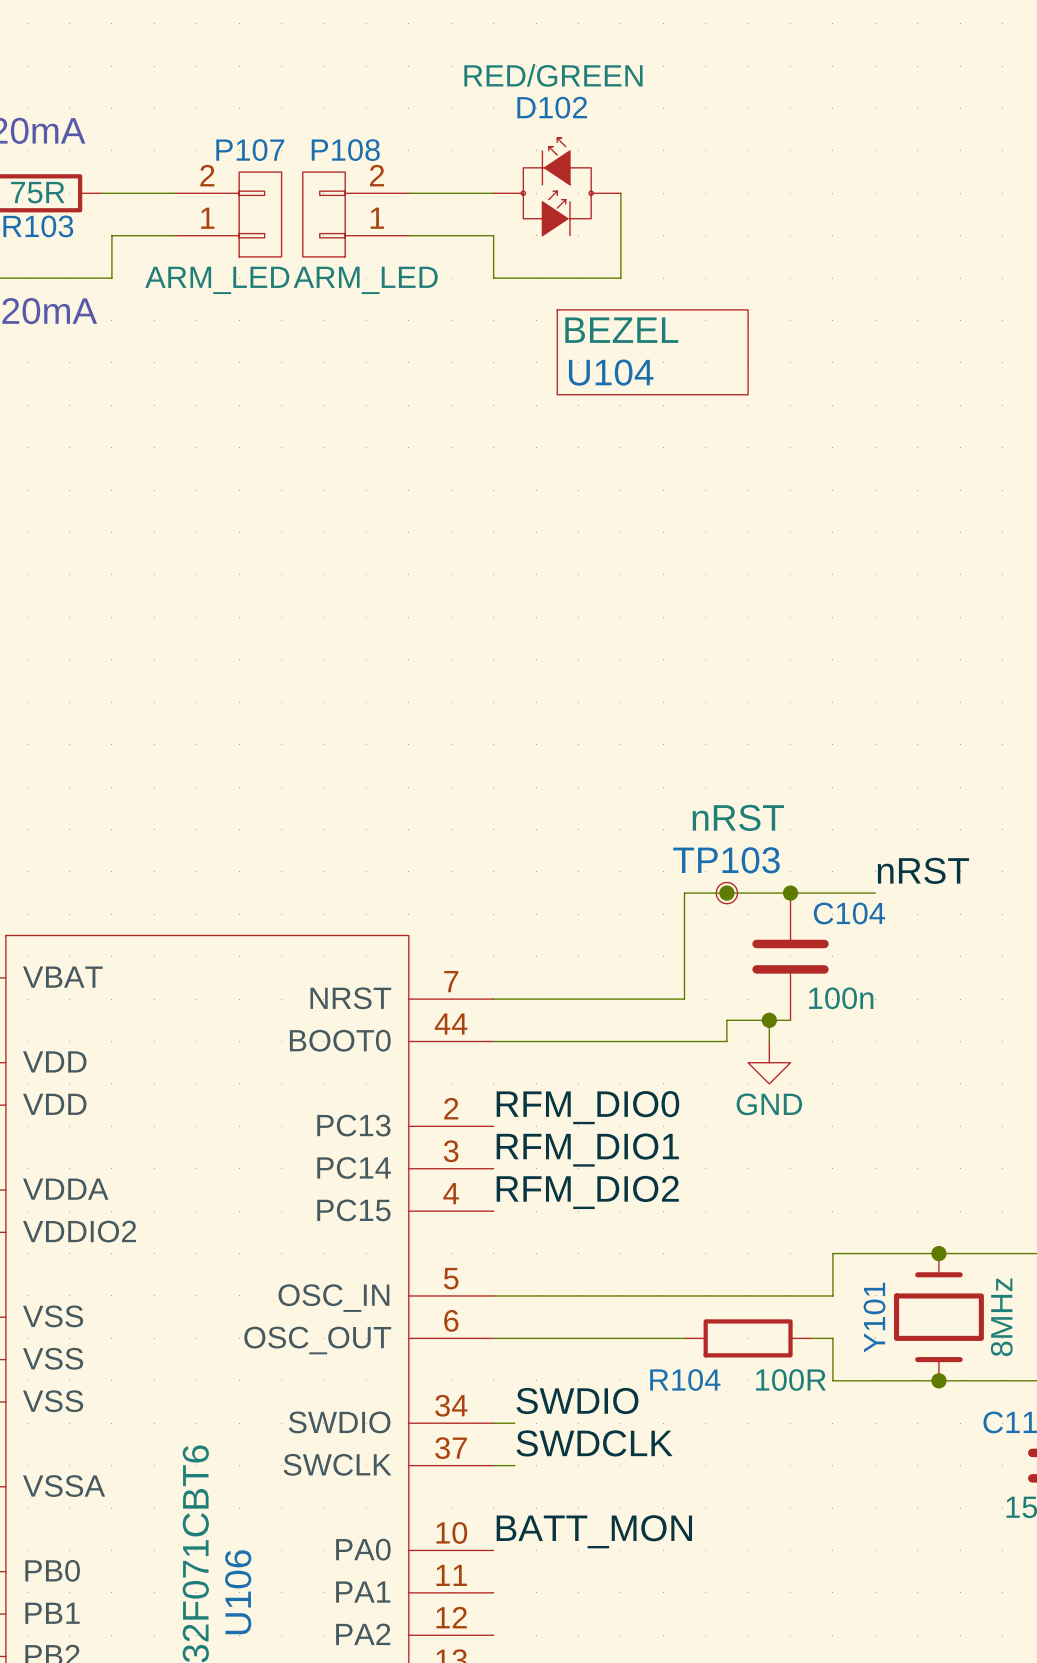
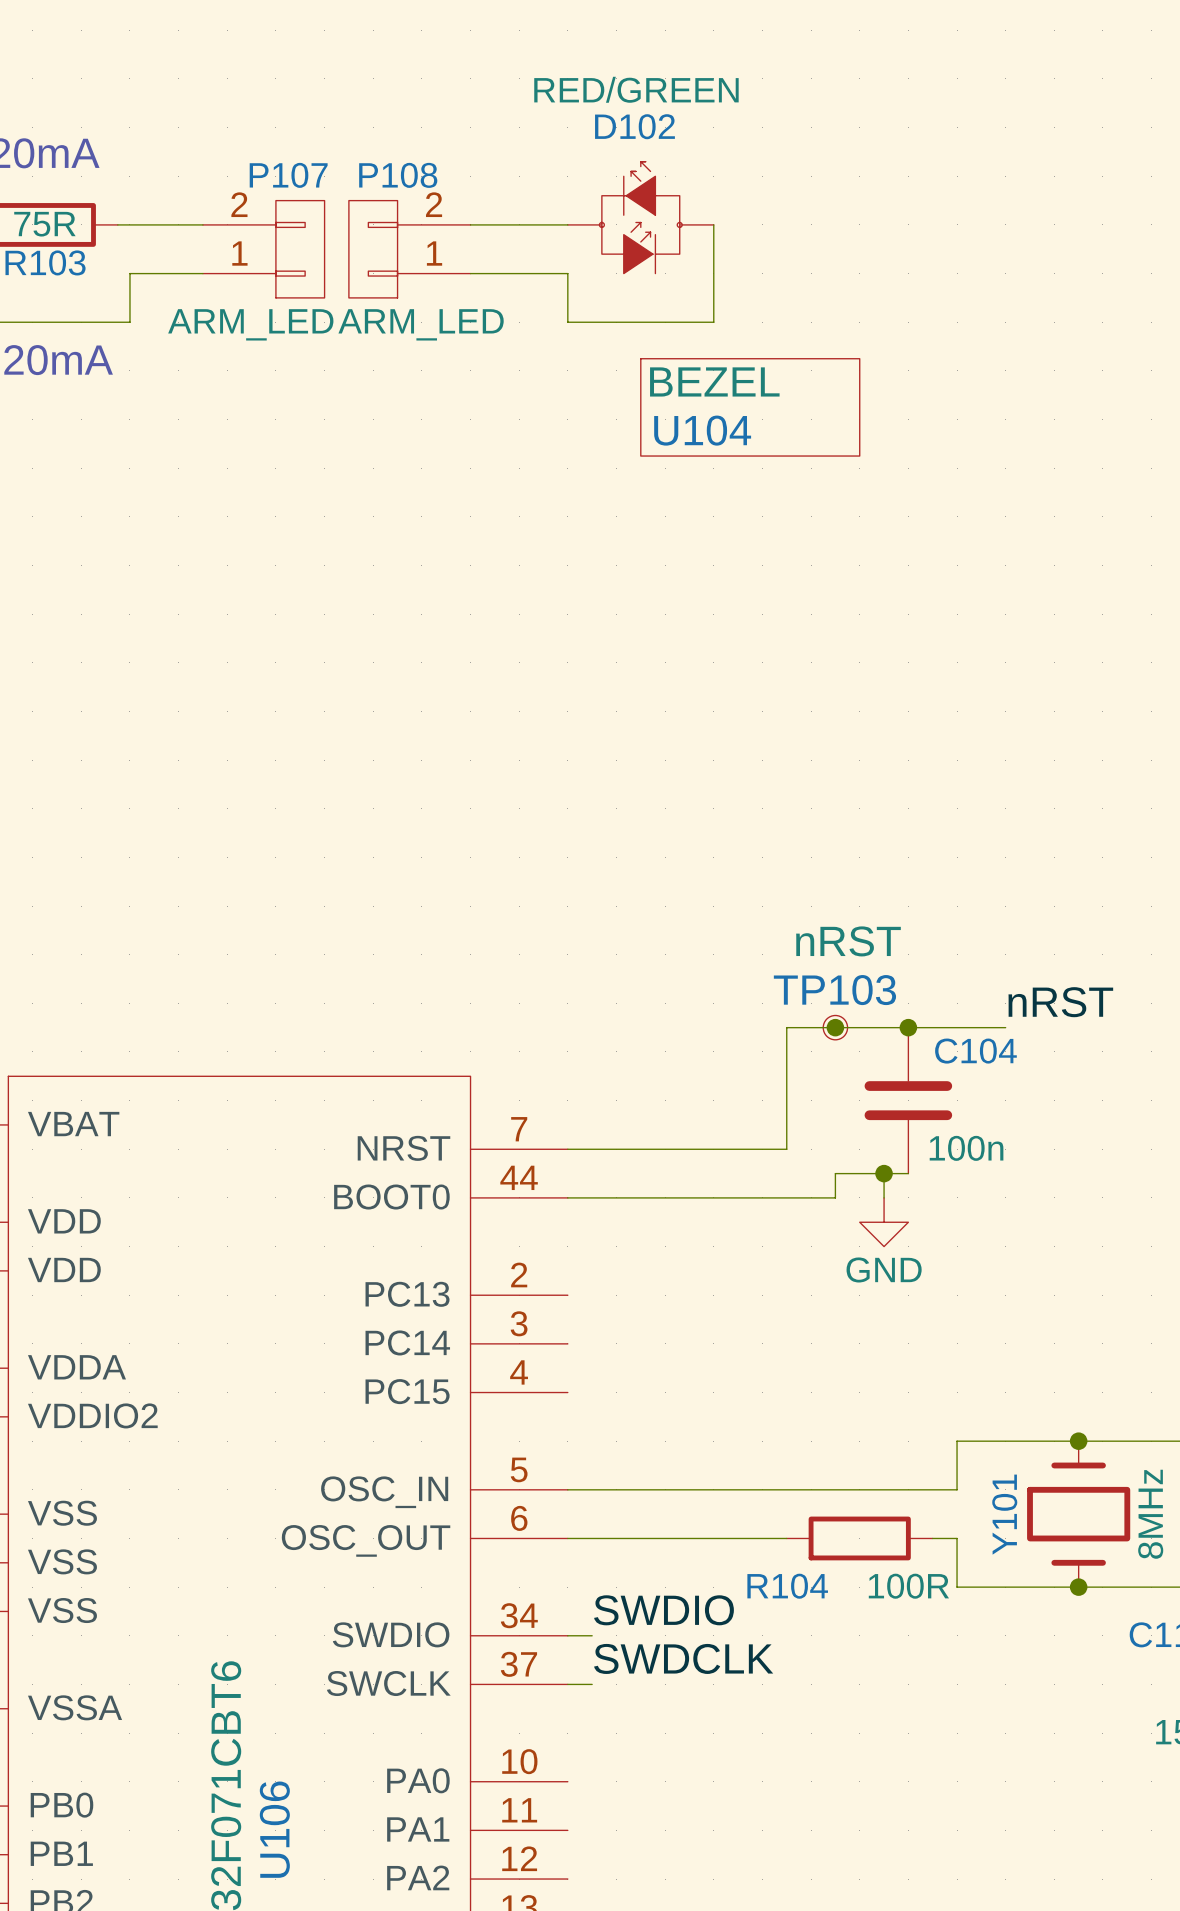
label: RFM_DIO0 (587, 1107) -> none
label: RFM_DIO1 (587, 1150) -> none
label: RFM_DIO2 (587, 1192) -> none
label: BATT_MON (594, 1531) -> none

